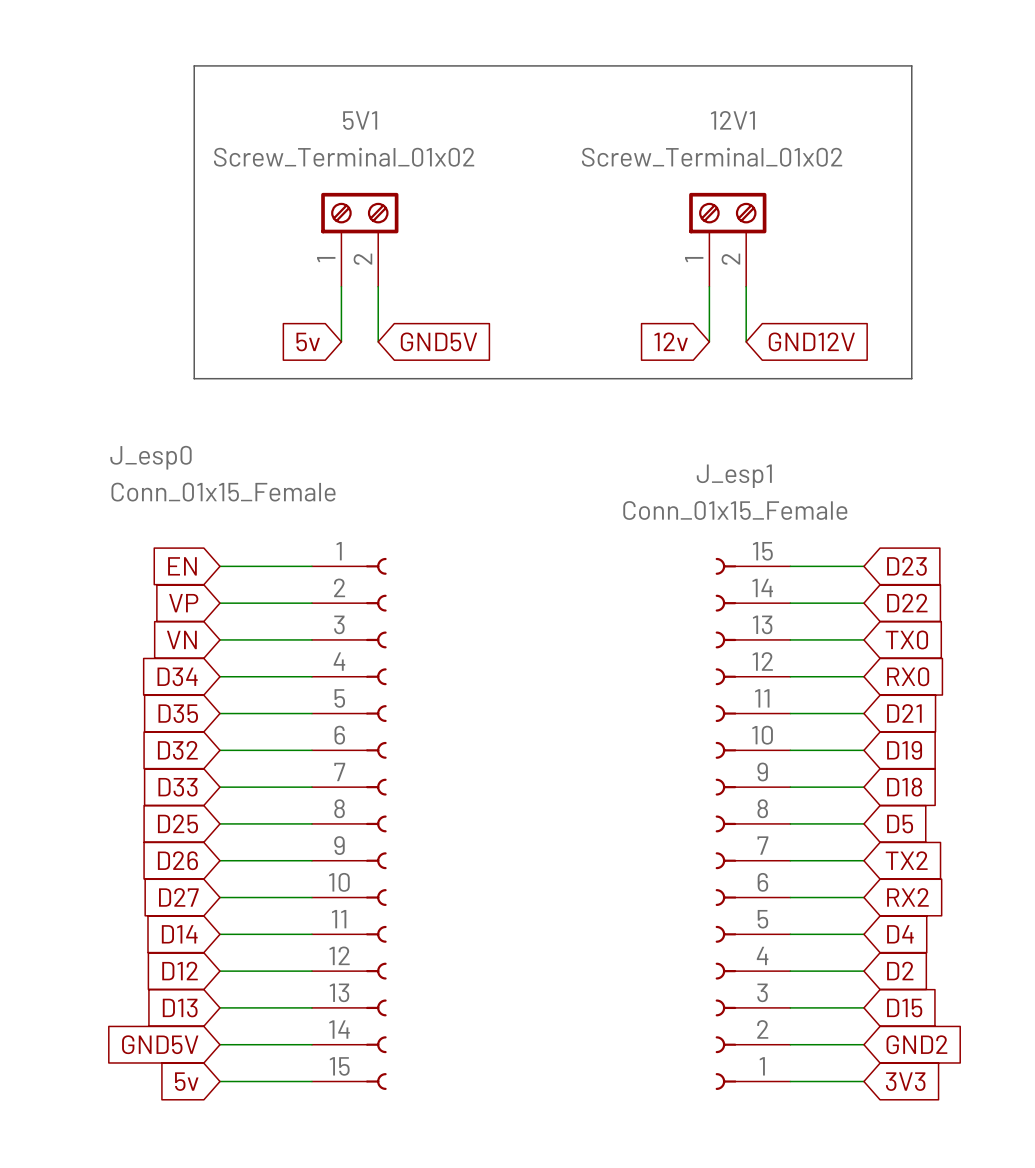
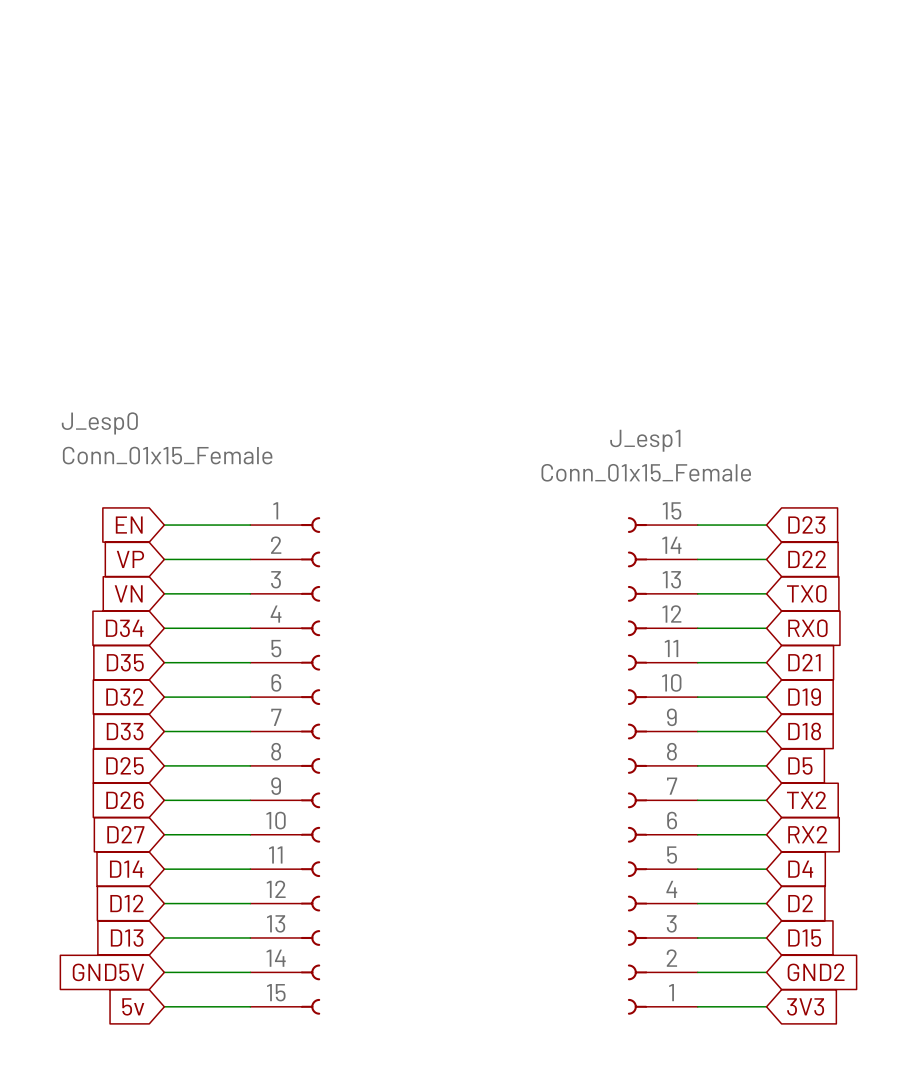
line: (194, 65) (911, 65) (911, 378) (194, 378) (194, 65) -> none
5V1: Screw_Terminal_01x02 (359, 239) -> none
12V1: Screw_Terminal_01x02 (727, 239) -> none
wire: (341, 286) (341, 341) -> none
wire: (378, 286) (378, 341) -> none
wire: (709, 286) (709, 341) -> none
wire: (746, 286) (746, 341) -> none
global label: 5v (308, 341) -> none
global label: GND5V (438, 341) -> none
global label: 12v (671, 341) -> none
global label: GND12V (811, 341) -> none

